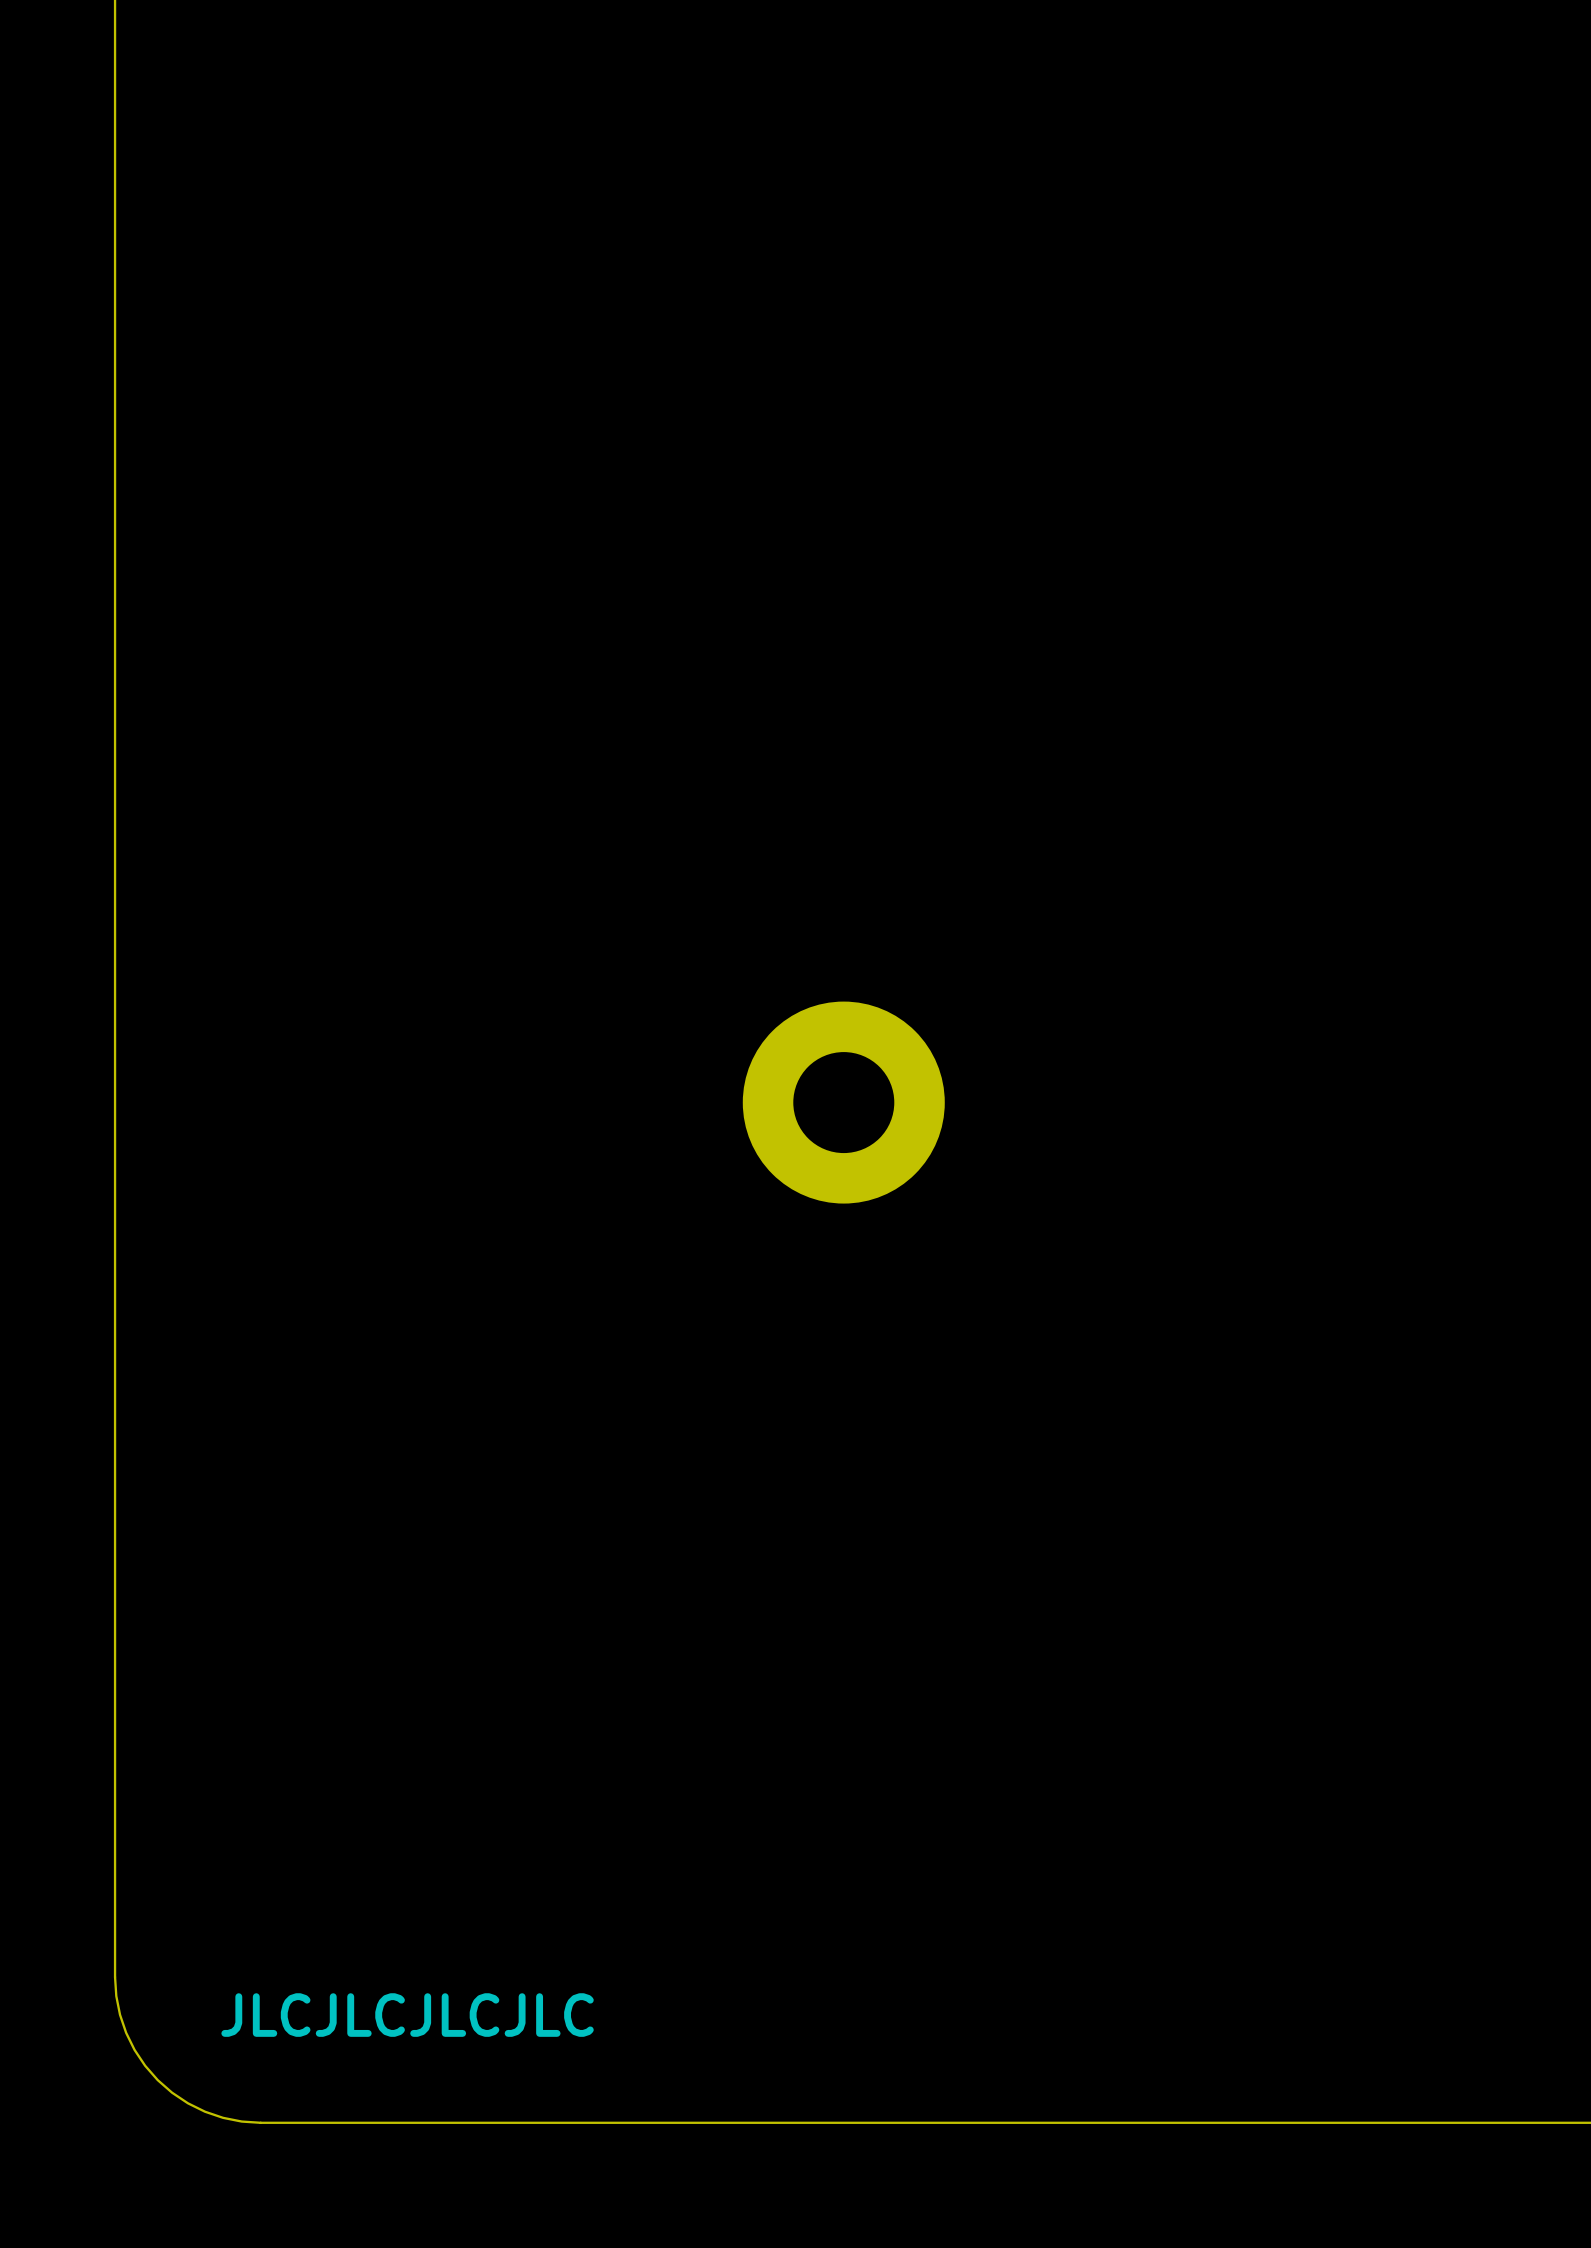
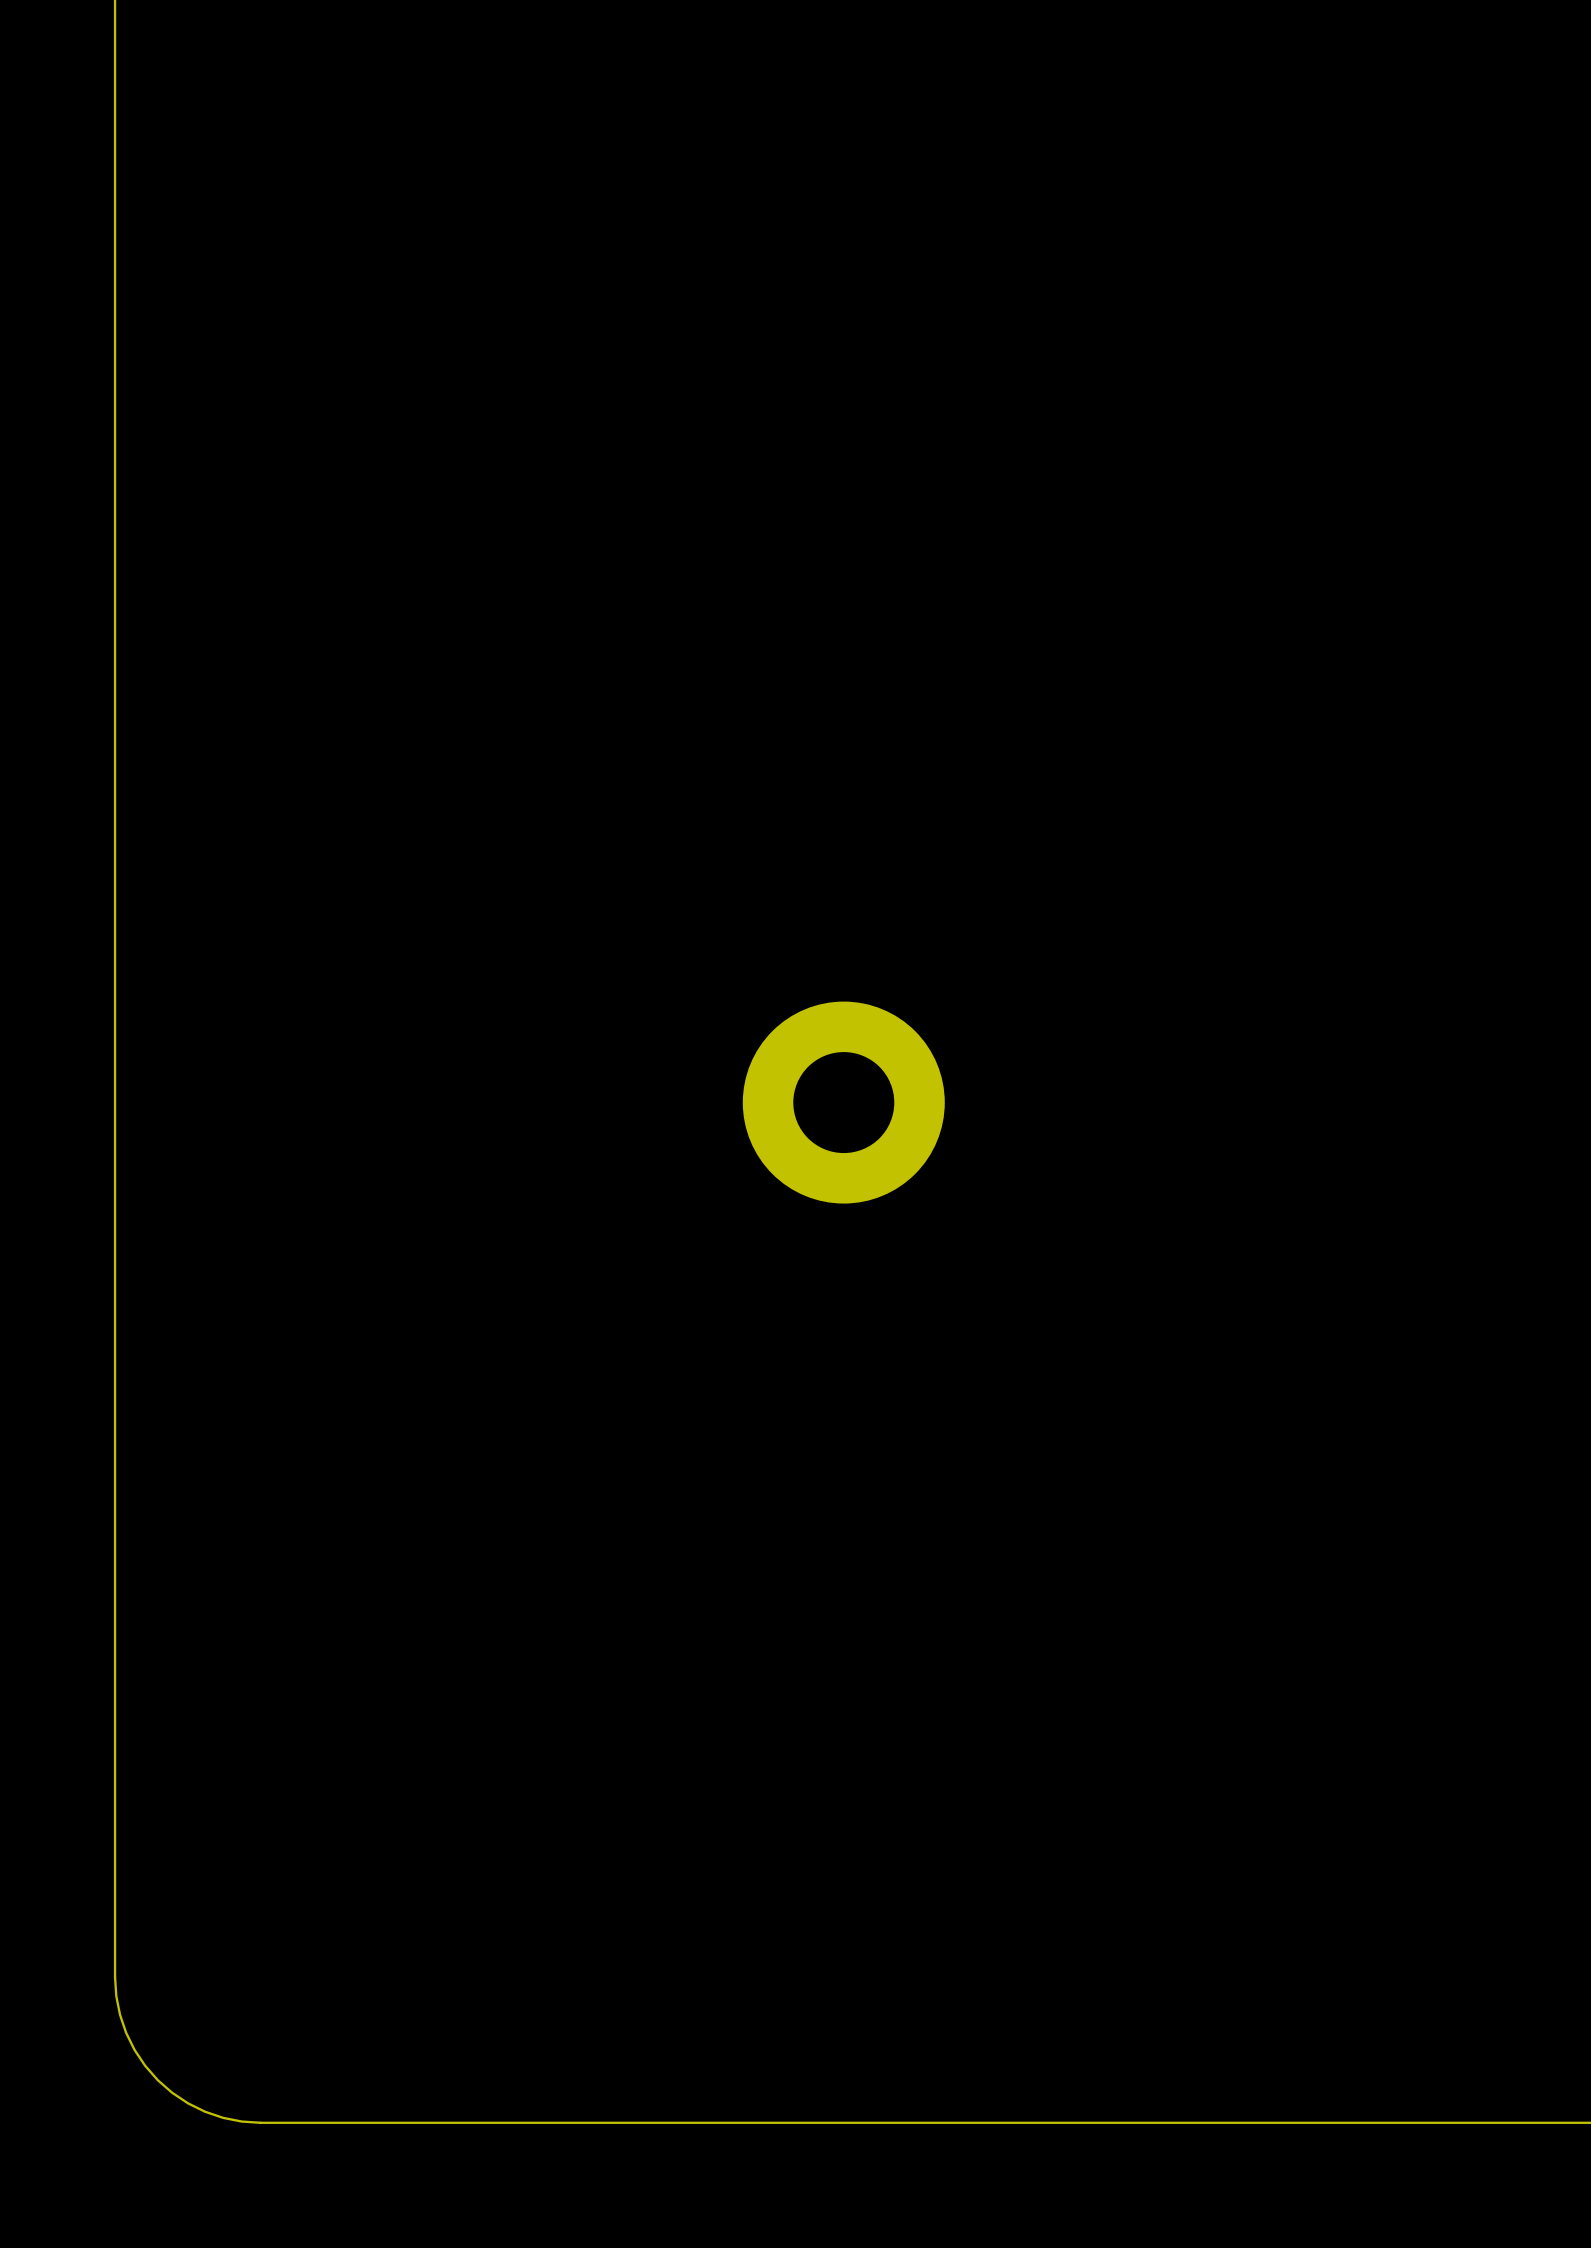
text: JLCJLCJLCJLC (407, 2015) -> none

